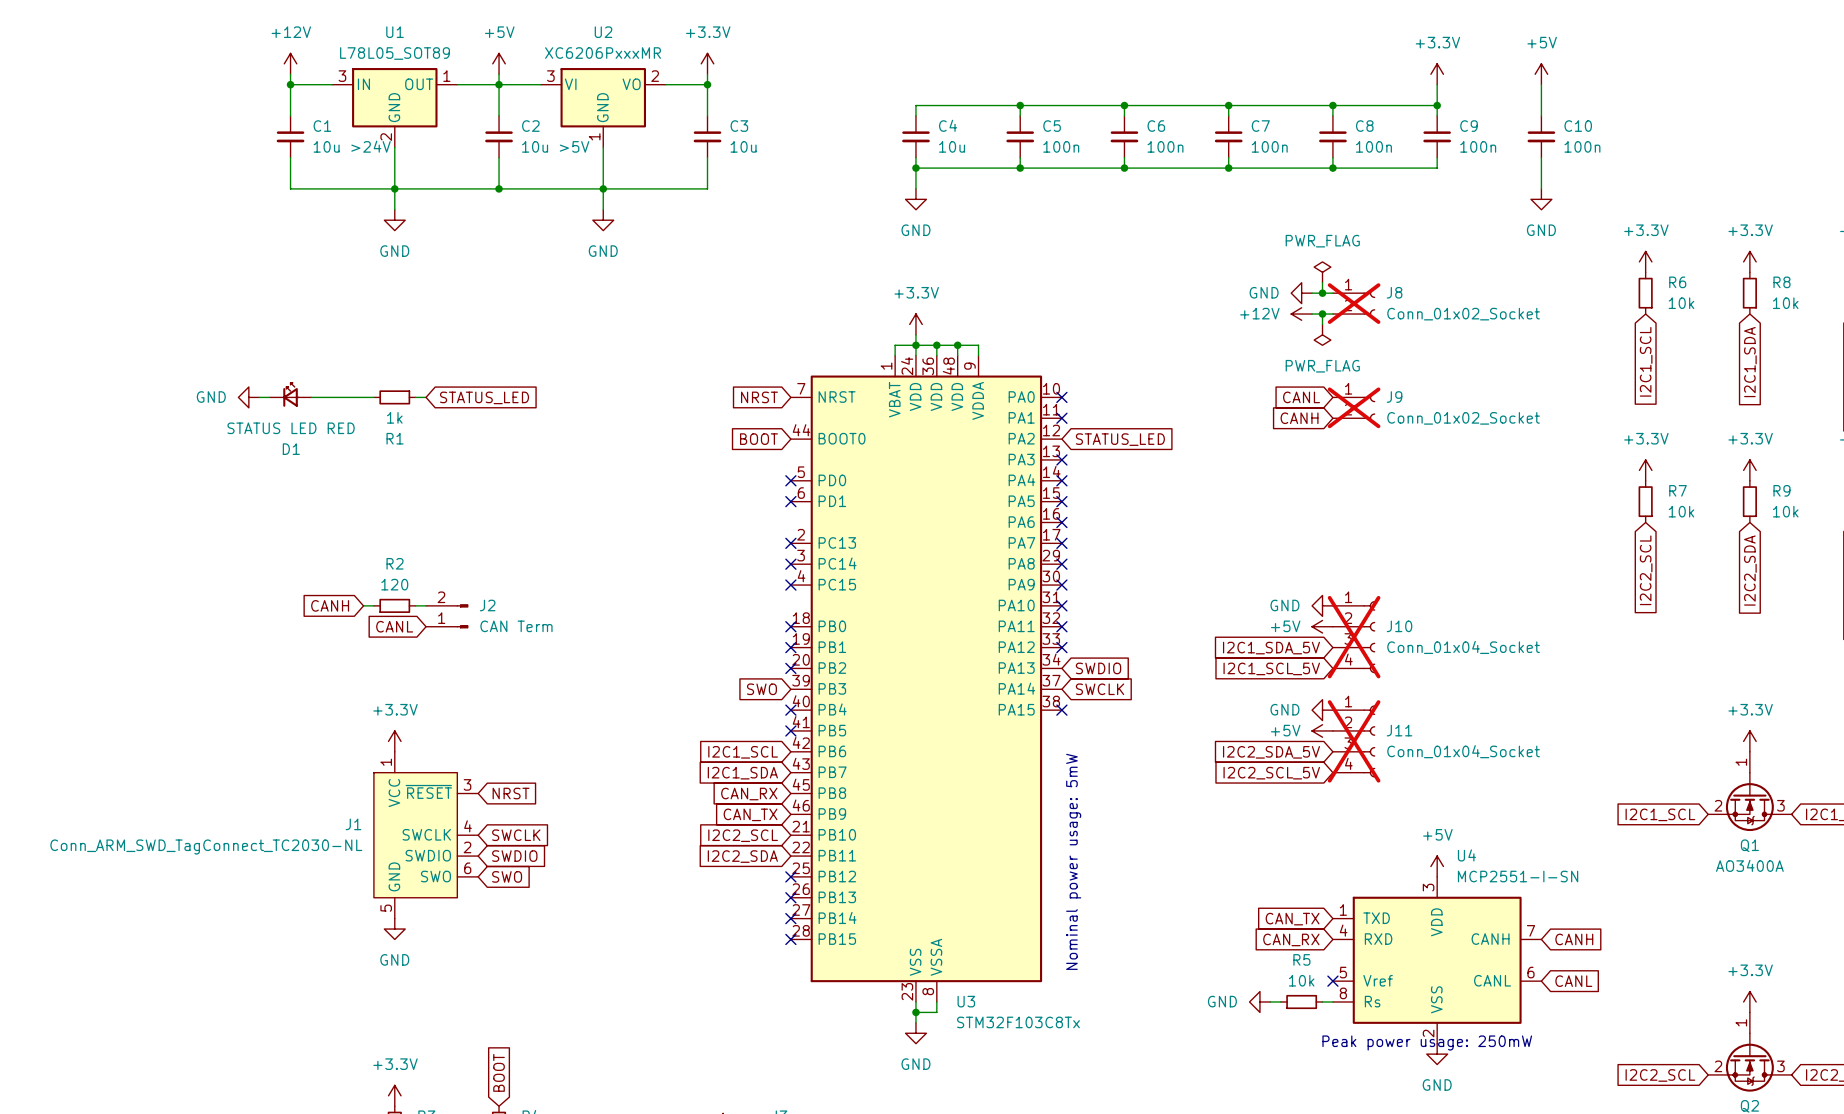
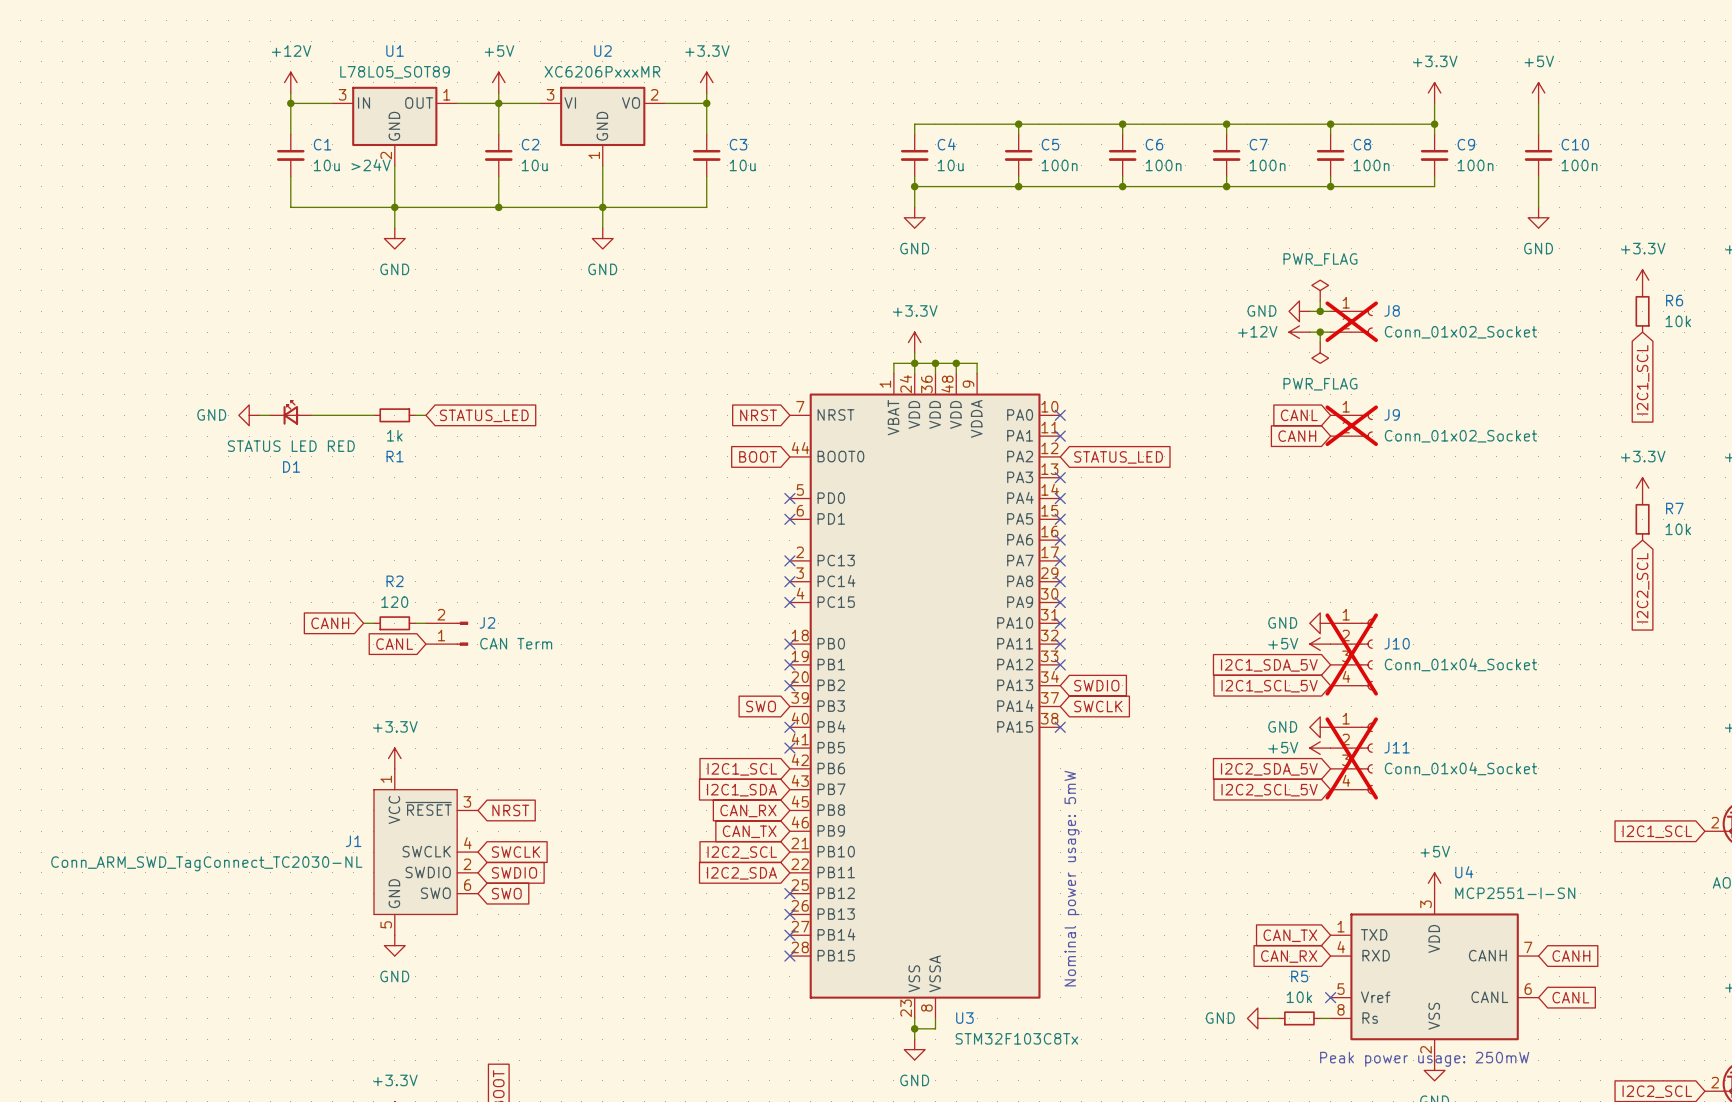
C2 value: 10u >5V (555, 146) -> 10u (534, 165)

